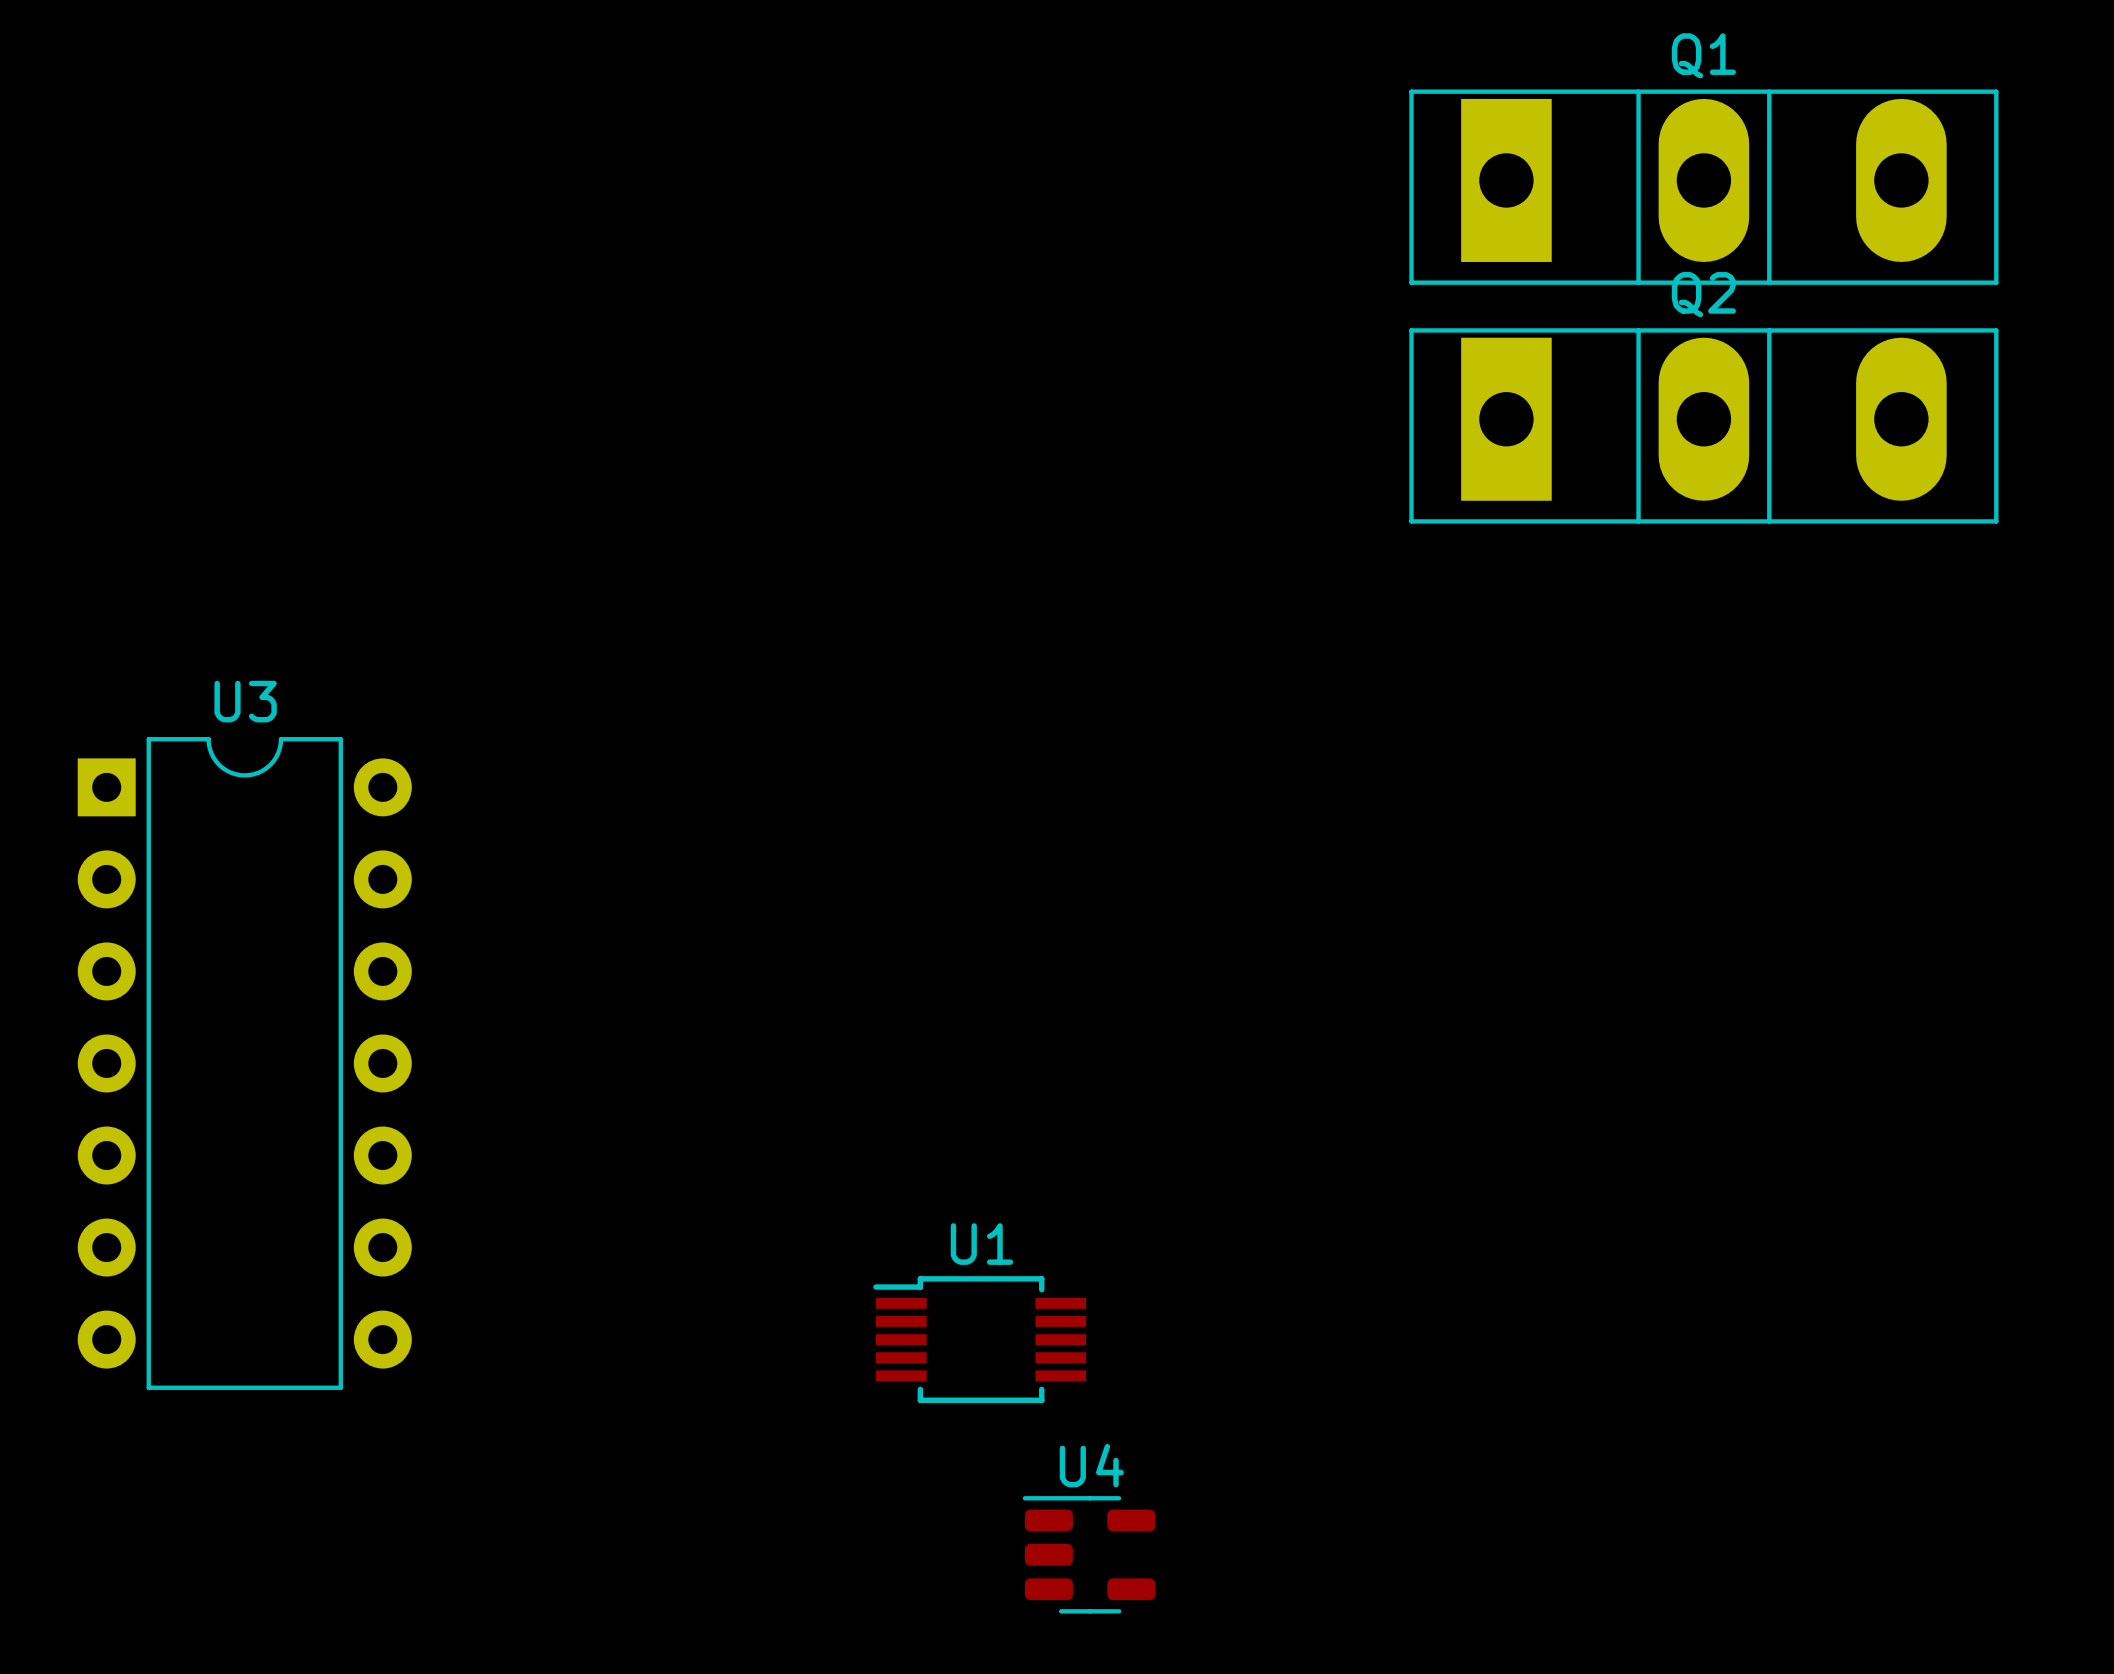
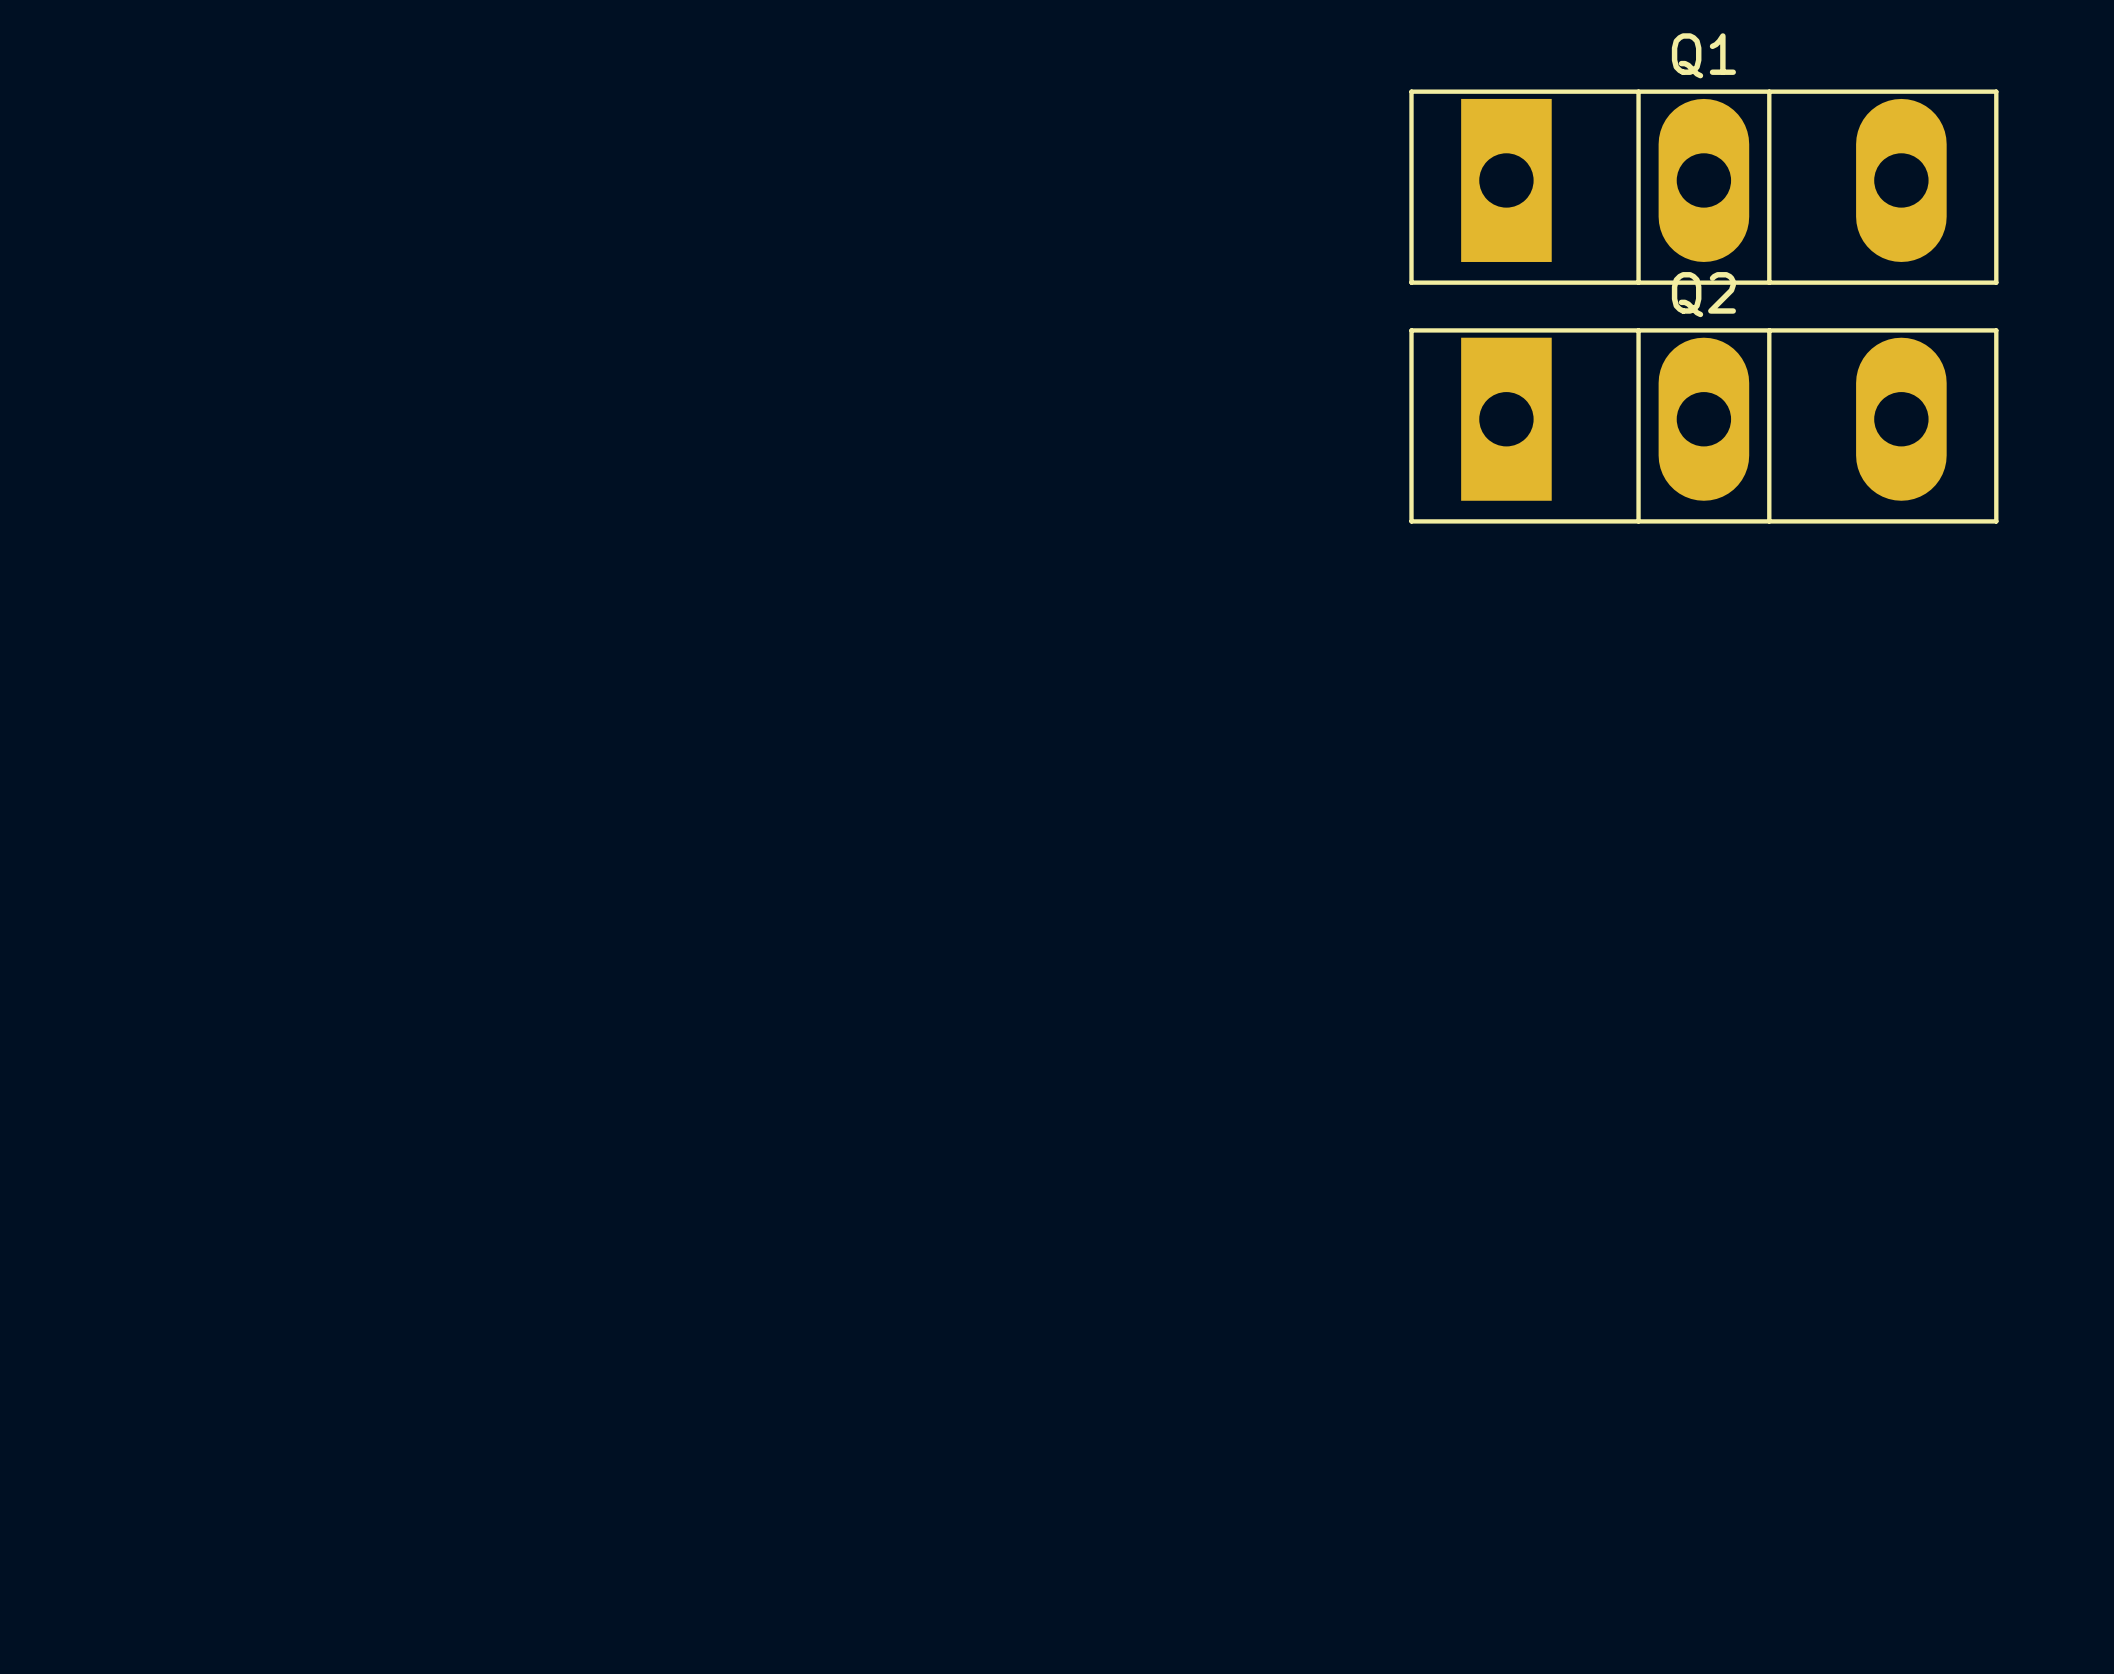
U3: (244, 1063) -> none
U1: (979, 1339) -> none
U4: (1089, 1554) -> none

